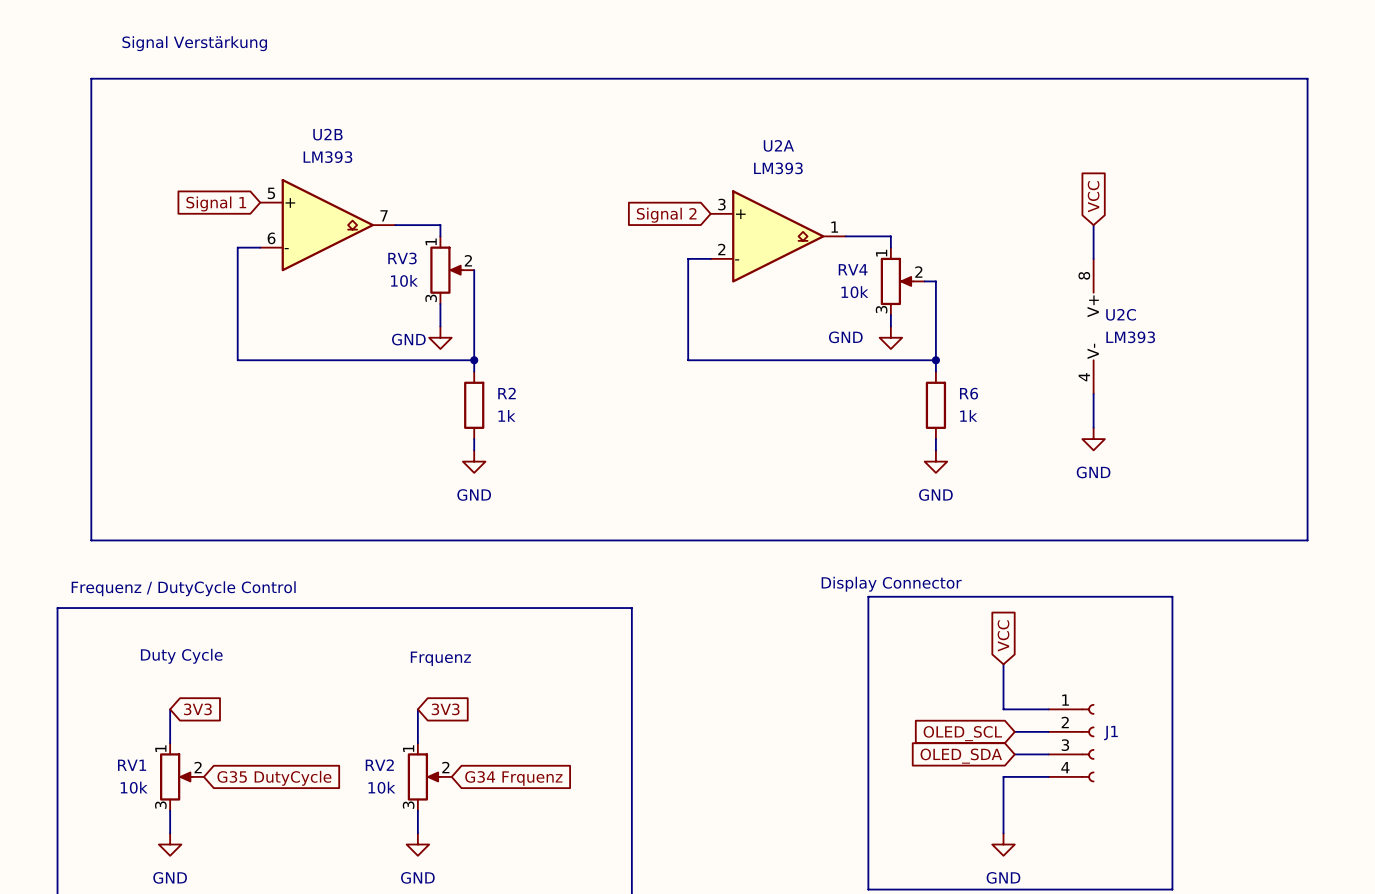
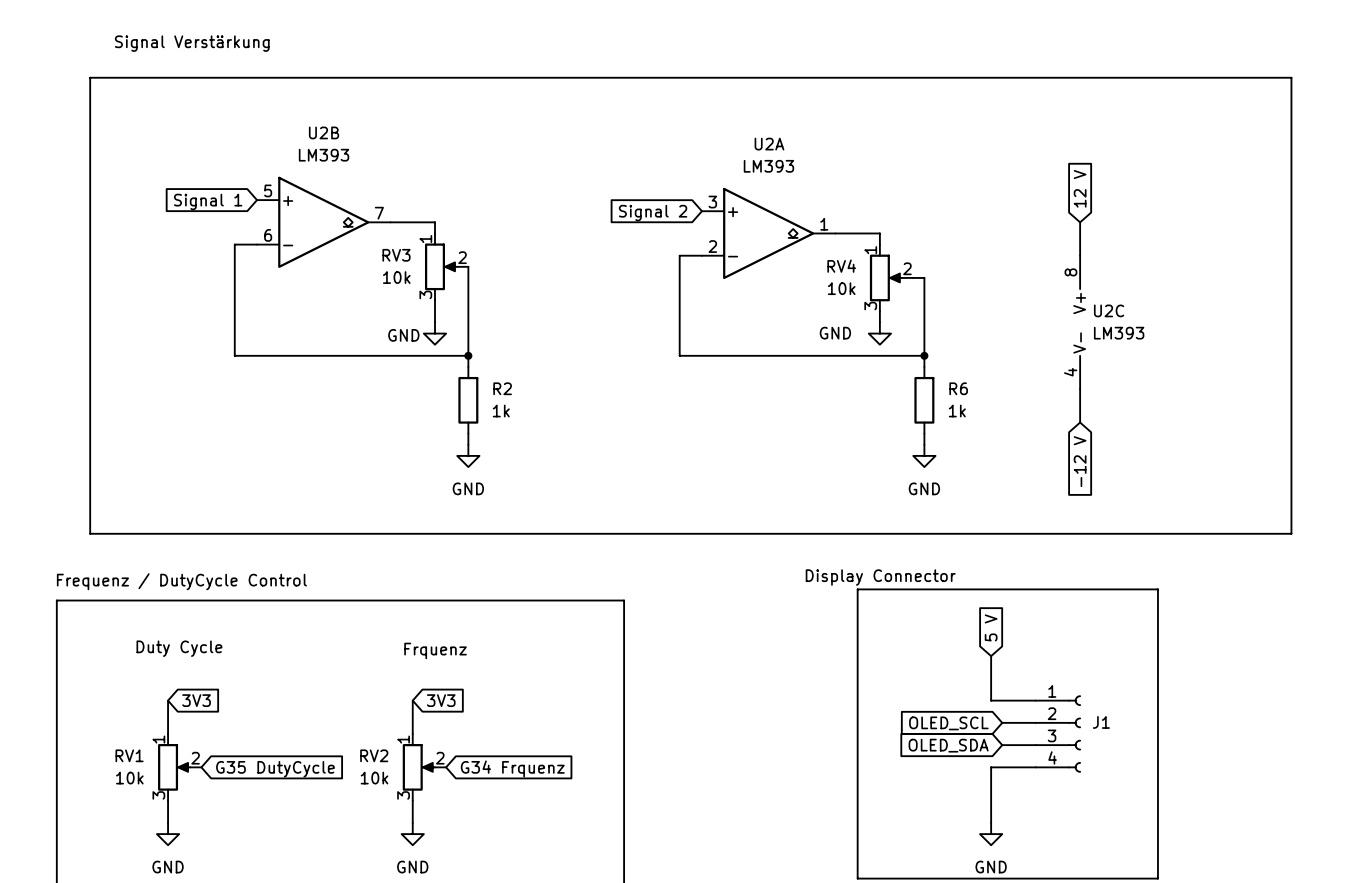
global label: VCC (1093, 196) -> 12 V (1080, 188)
power symbol: GND (1093, 439) -> none
global label: none -> -12 V (1080, 461)
global label: VCC (1003, 635) -> 5 V (991, 627)

